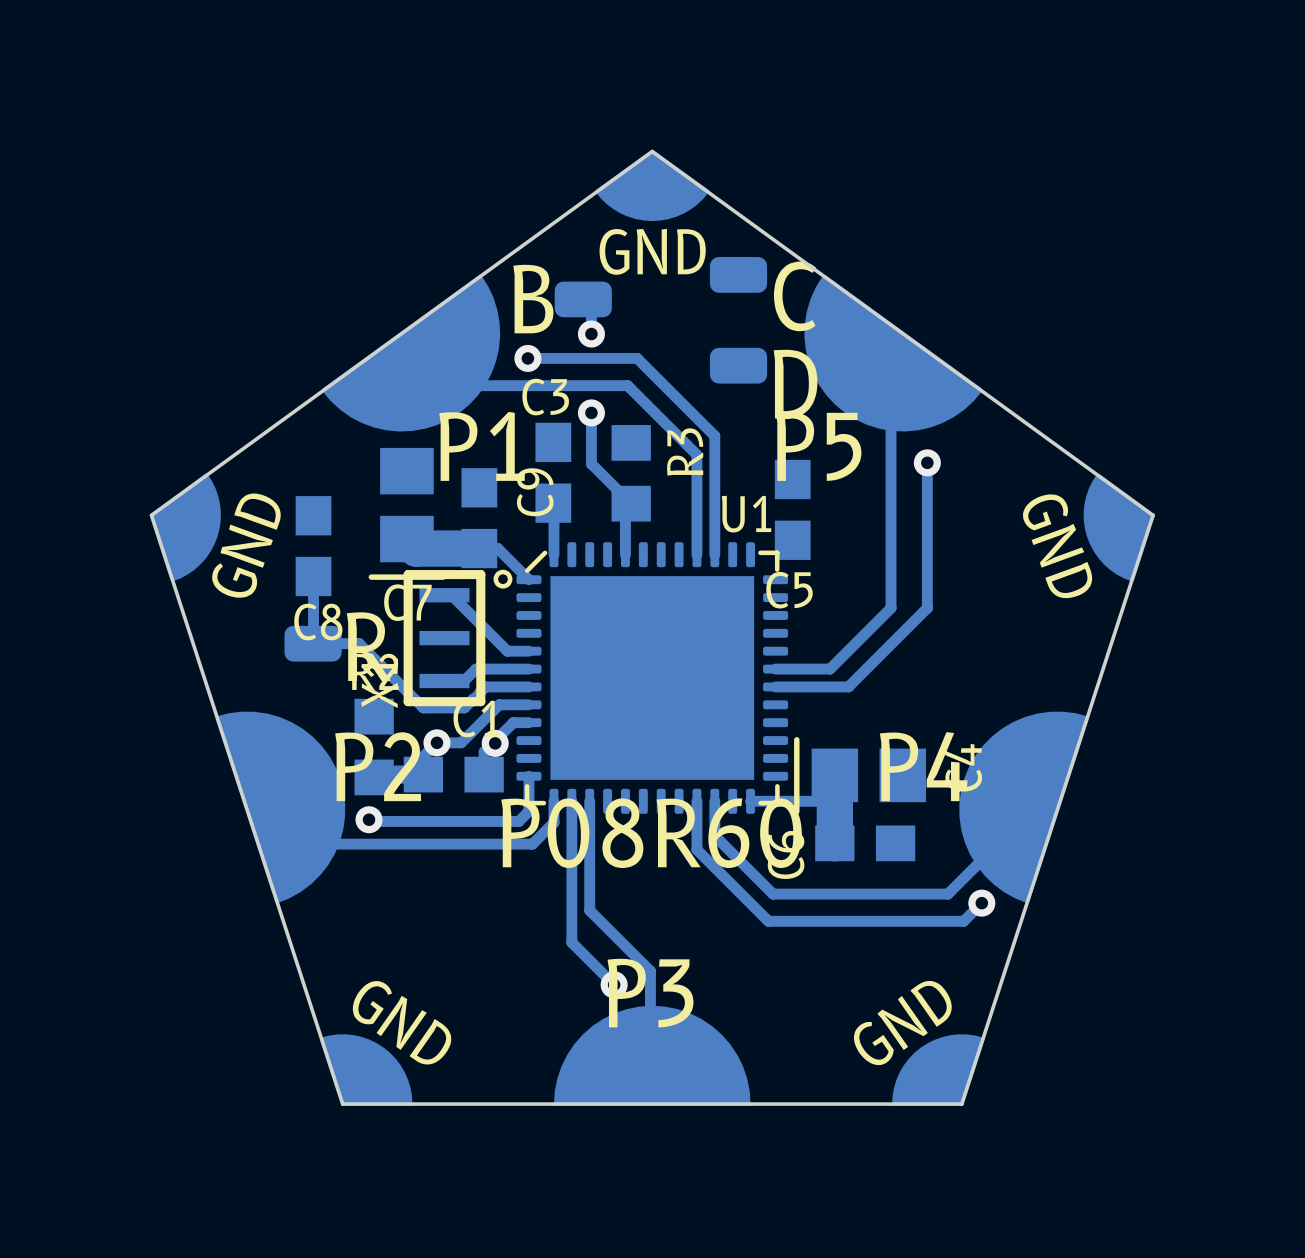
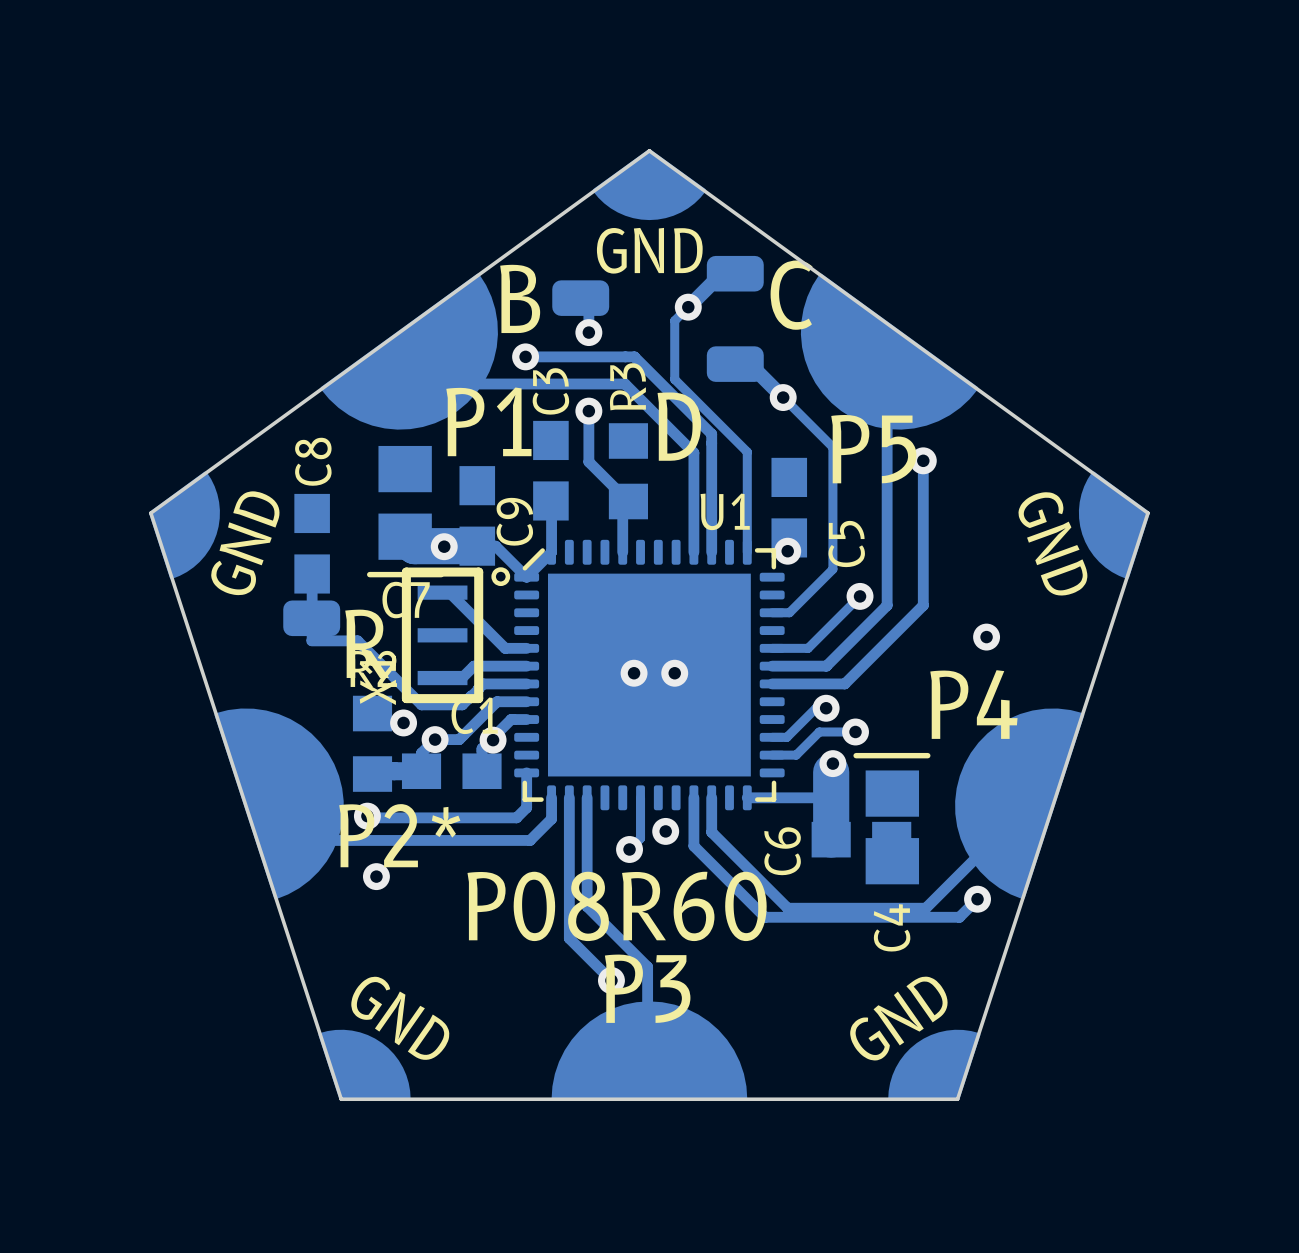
track: none -> (735, 273) (721, 273) (674, 320) (674, 379) (747, 452) (747, 552)
text position: B (533, 299) -> B (520, 298)
via: none -> (688, 307)
track: none -> (735, 364) (749, 364) (832, 447) (832, 569) (789, 612) (772, 612)
text position: D (795, 384) -> D (679, 426)
C3 name rotation: 0° (545, 397) -> 90° counterclockwise (550, 391)
via: none -> (783, 397)
text position: P1 (481, 446) -> P1 (488, 421)
text position: P5 (818, 446) -> P5 (873, 449)
R3 name position: R3 (685, 452) -> R3 (627, 386)
C9 name position: C9 (535, 492) -> C9 (514, 521)
U1 name position: U1 (746, 514) -> U1 (725, 511)
via: none -> (444, 546)
via: none -> (787, 551)
track: none -> (551, 552) (526, 577)
C5 name rotation: 0° (789, 590) -> 90° counterclockwise (846, 543)
C5 name position: C5 (789, 590) -> C5 (846, 543)
track: none -> (860, 596) (808, 648) (772, 648)
via: none -> (860, 596)
C8 name rotation: 0° (318, 622) -> 90° counterclockwise (313, 461)
C8 name position: C8 (318, 622) -> C8 (313, 461)
via: none -> (986, 637)
part position: (313, 643) -> (311, 618)
via: none -> (634, 673)
via: none -> (674, 673)
track: none -> (826, 708) (815, 708) (786, 737) (772, 737)
via: none -> (826, 708)
via: none -> (403, 722)
track: none -> (855, 731) (819, 731) (796, 755) (772, 755)
via: none -> (855, 731)
text: P2 (378, 766) -> P2* (399, 835)
via: none -> (832, 763)
text position: P4 (923, 766) -> P4 (973, 704)
C4 rotation: 0° (860, 775) -> 90° clockwise (891, 818)
track: none -> (640, 797) (640, 838) (629, 849)
text position: P08R60 (651, 833) -> P08R60 (617, 906)
via: none -> (665, 831)
via: none -> (629, 849)
via: none -> (376, 876)
track: (948, 894) (773, 894) -> (943, 890) (925, 908) (787, 908) (769, 890)

